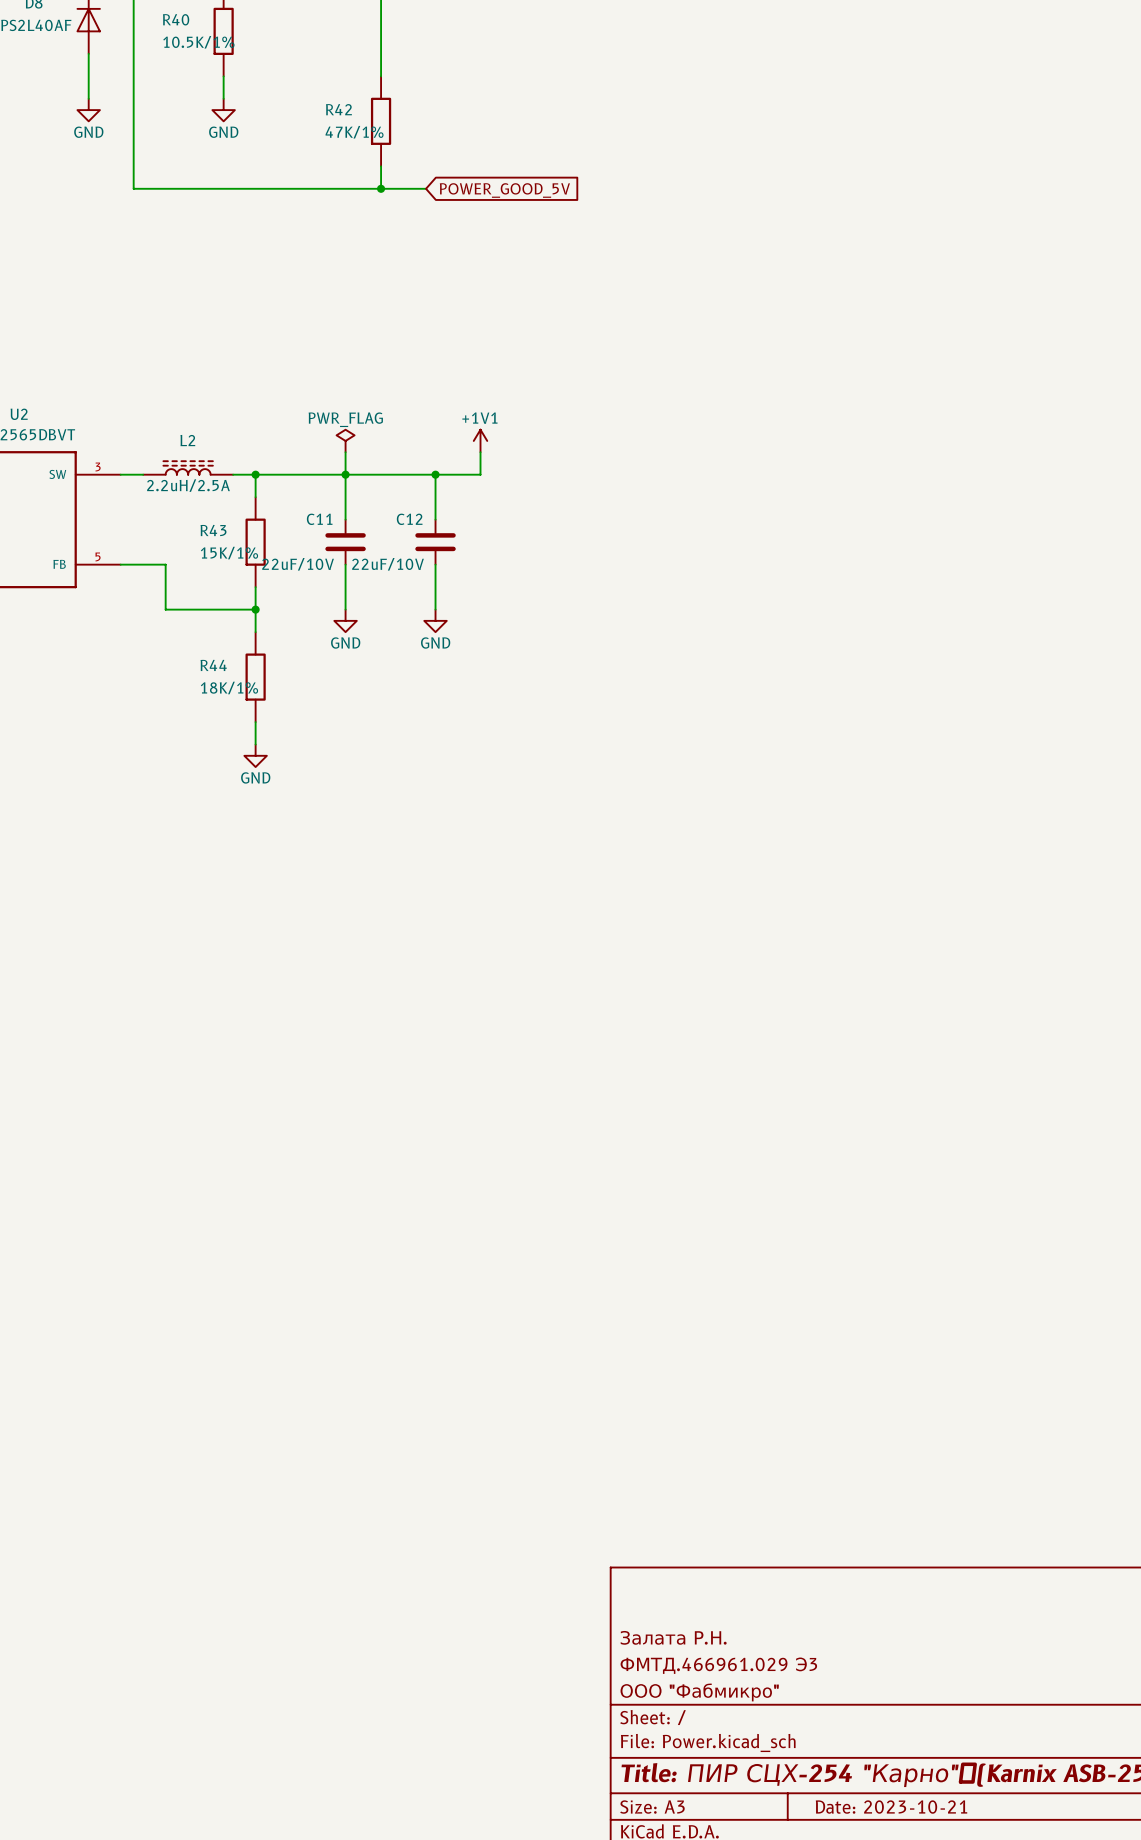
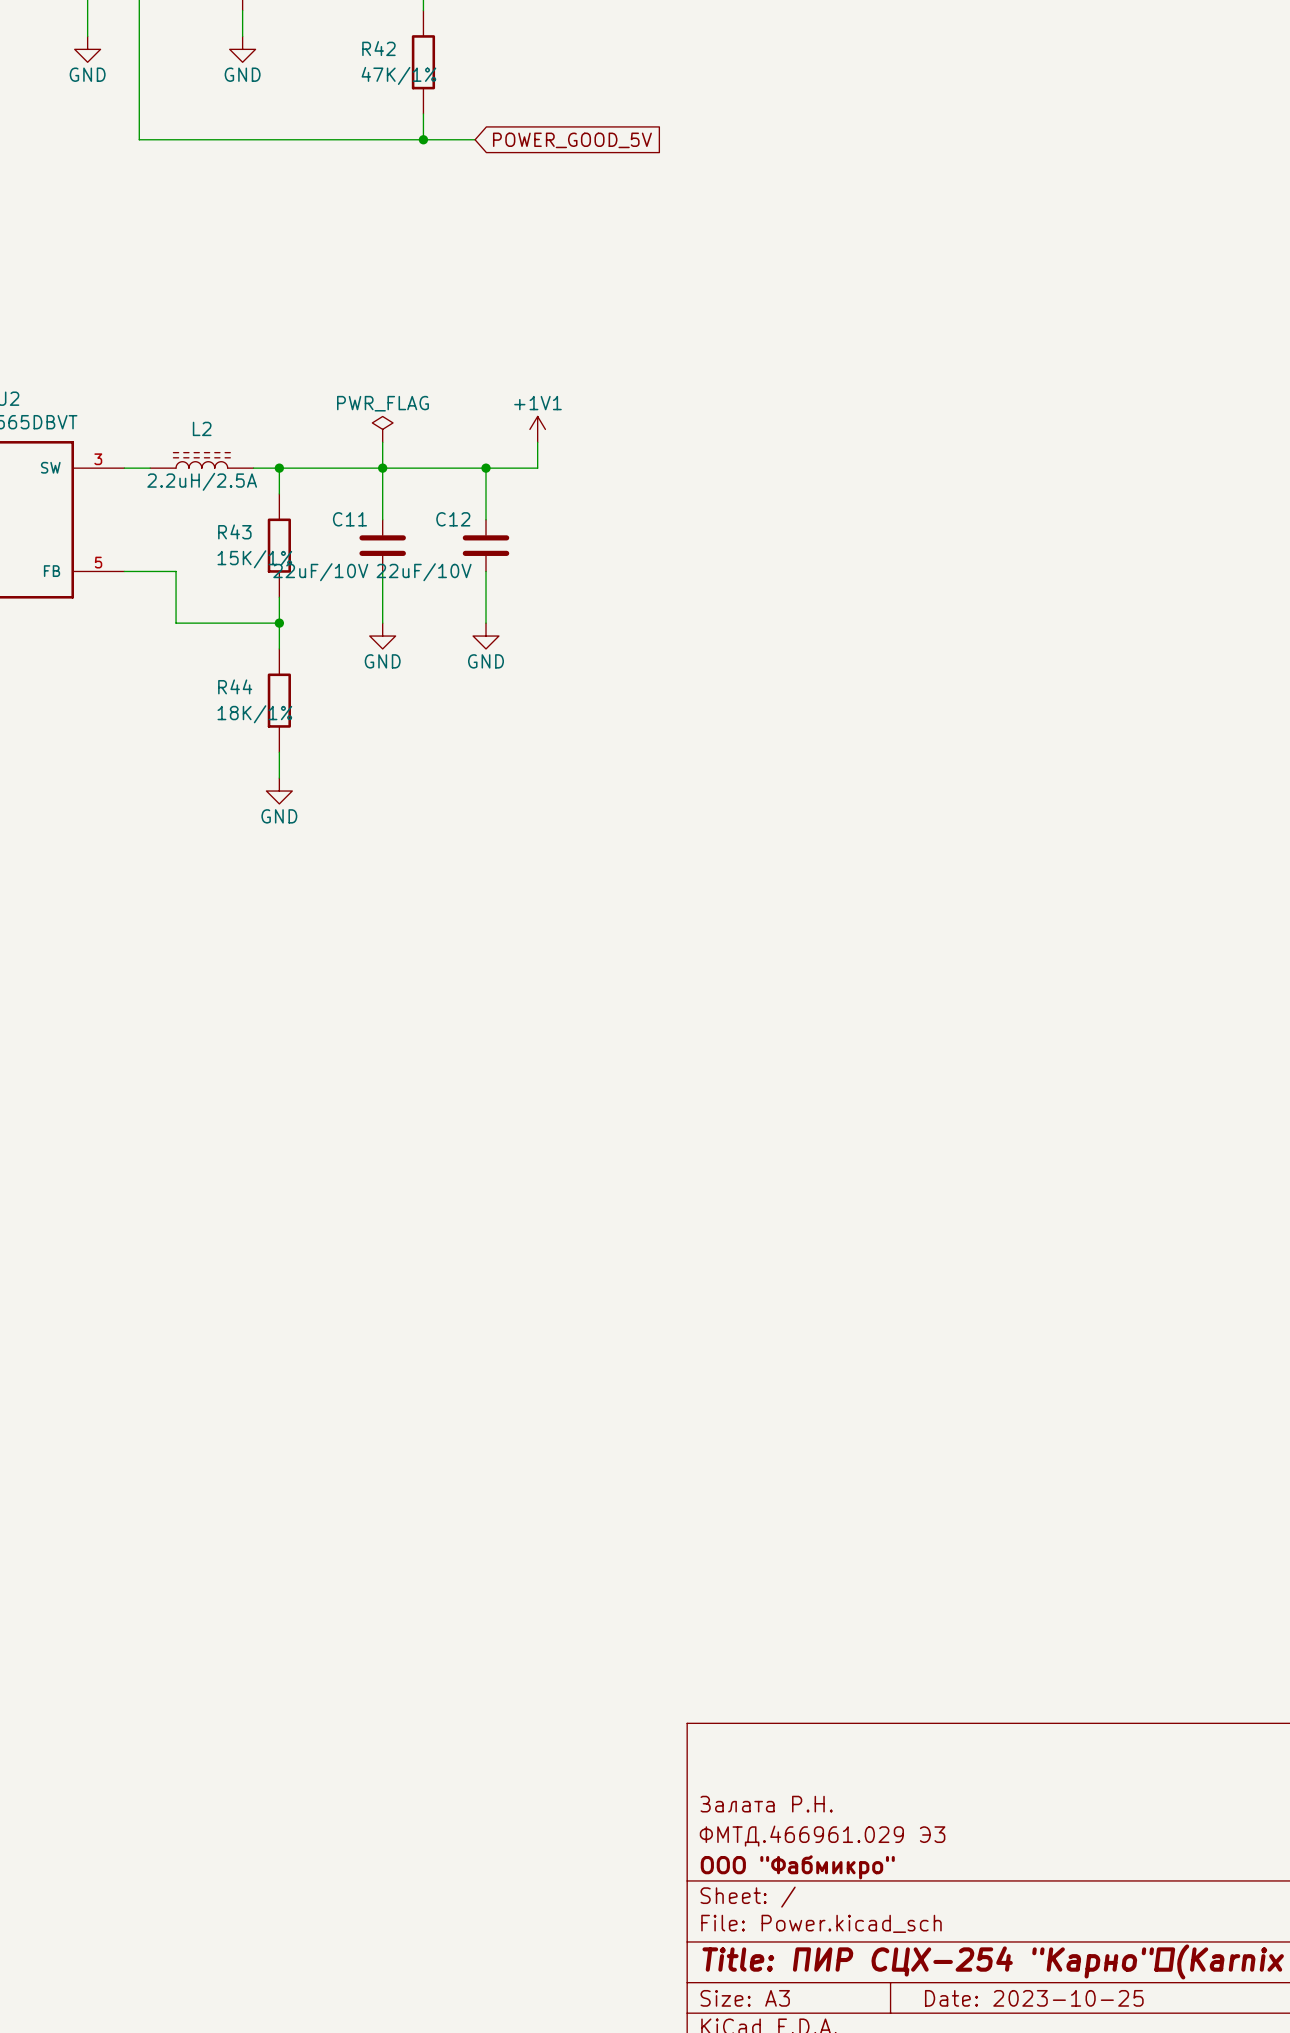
title block: Date: 2023-10-21 (891, 1807) -> Date: 2023-10-25 (1034, 1998)

